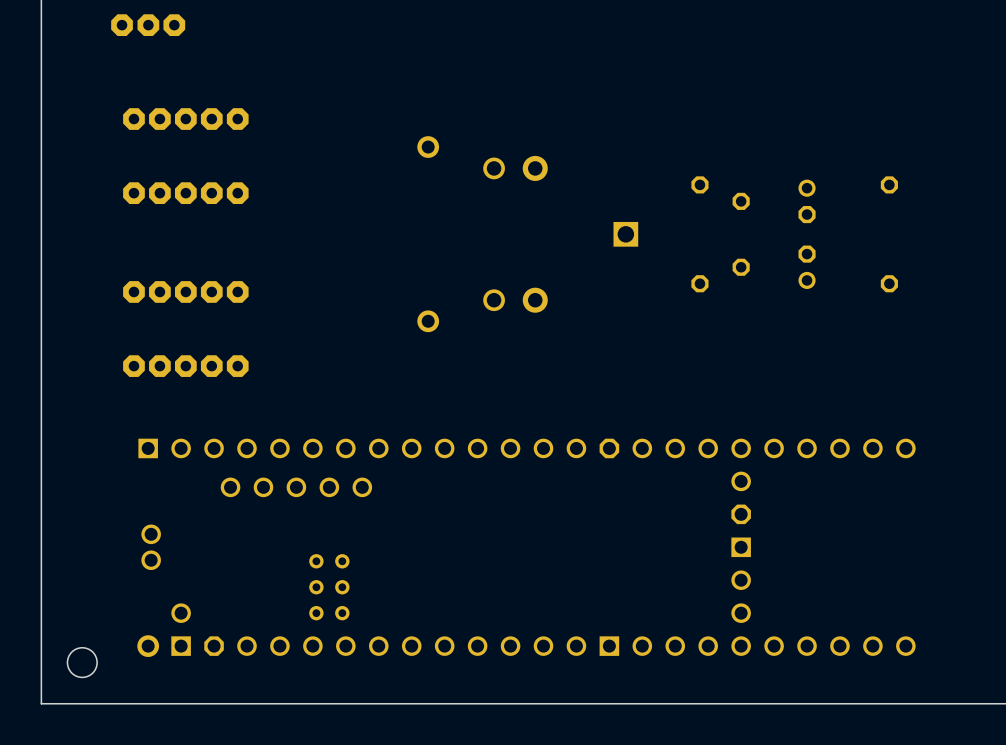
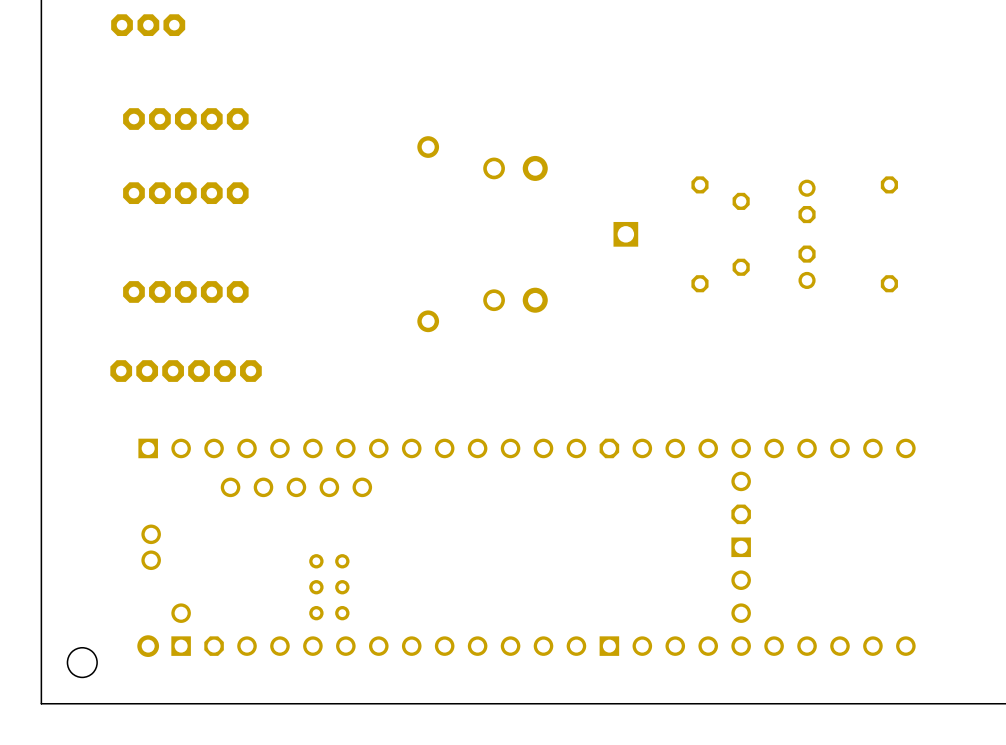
part footprint: [123, 355, 249, 377] -> [110, 360, 262, 382]

